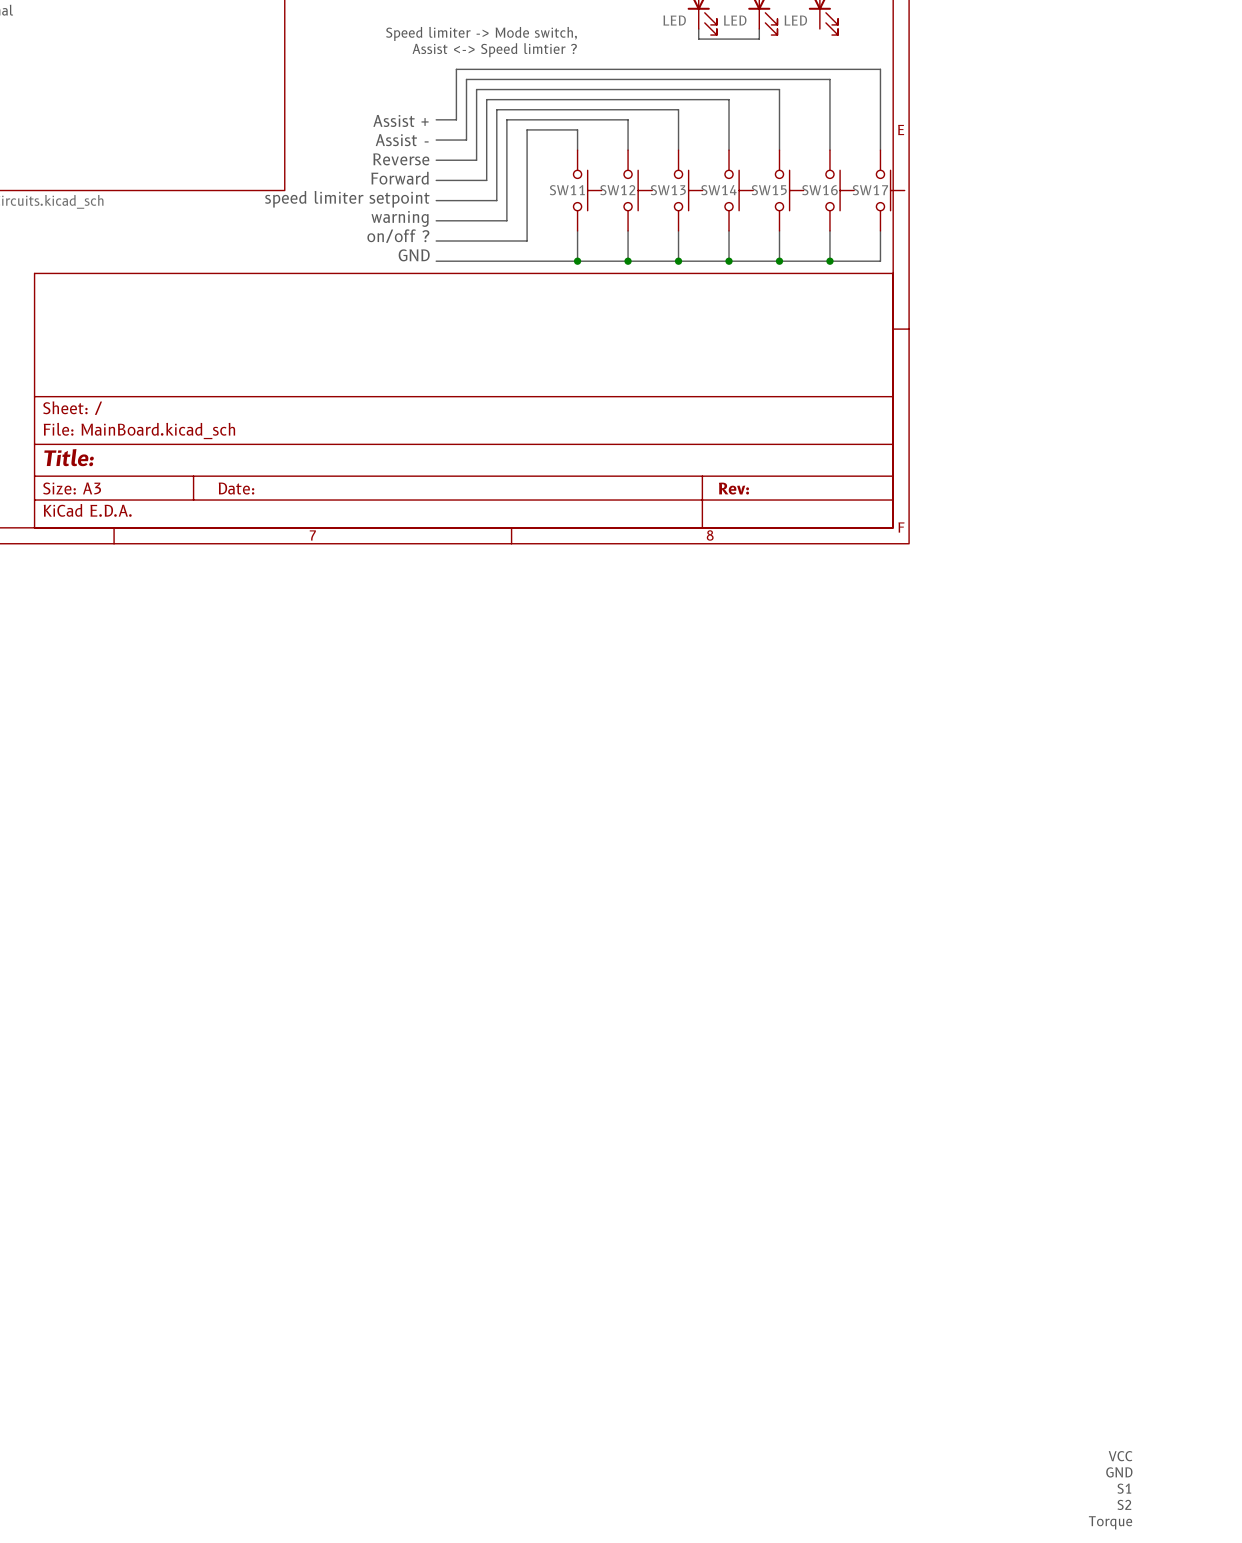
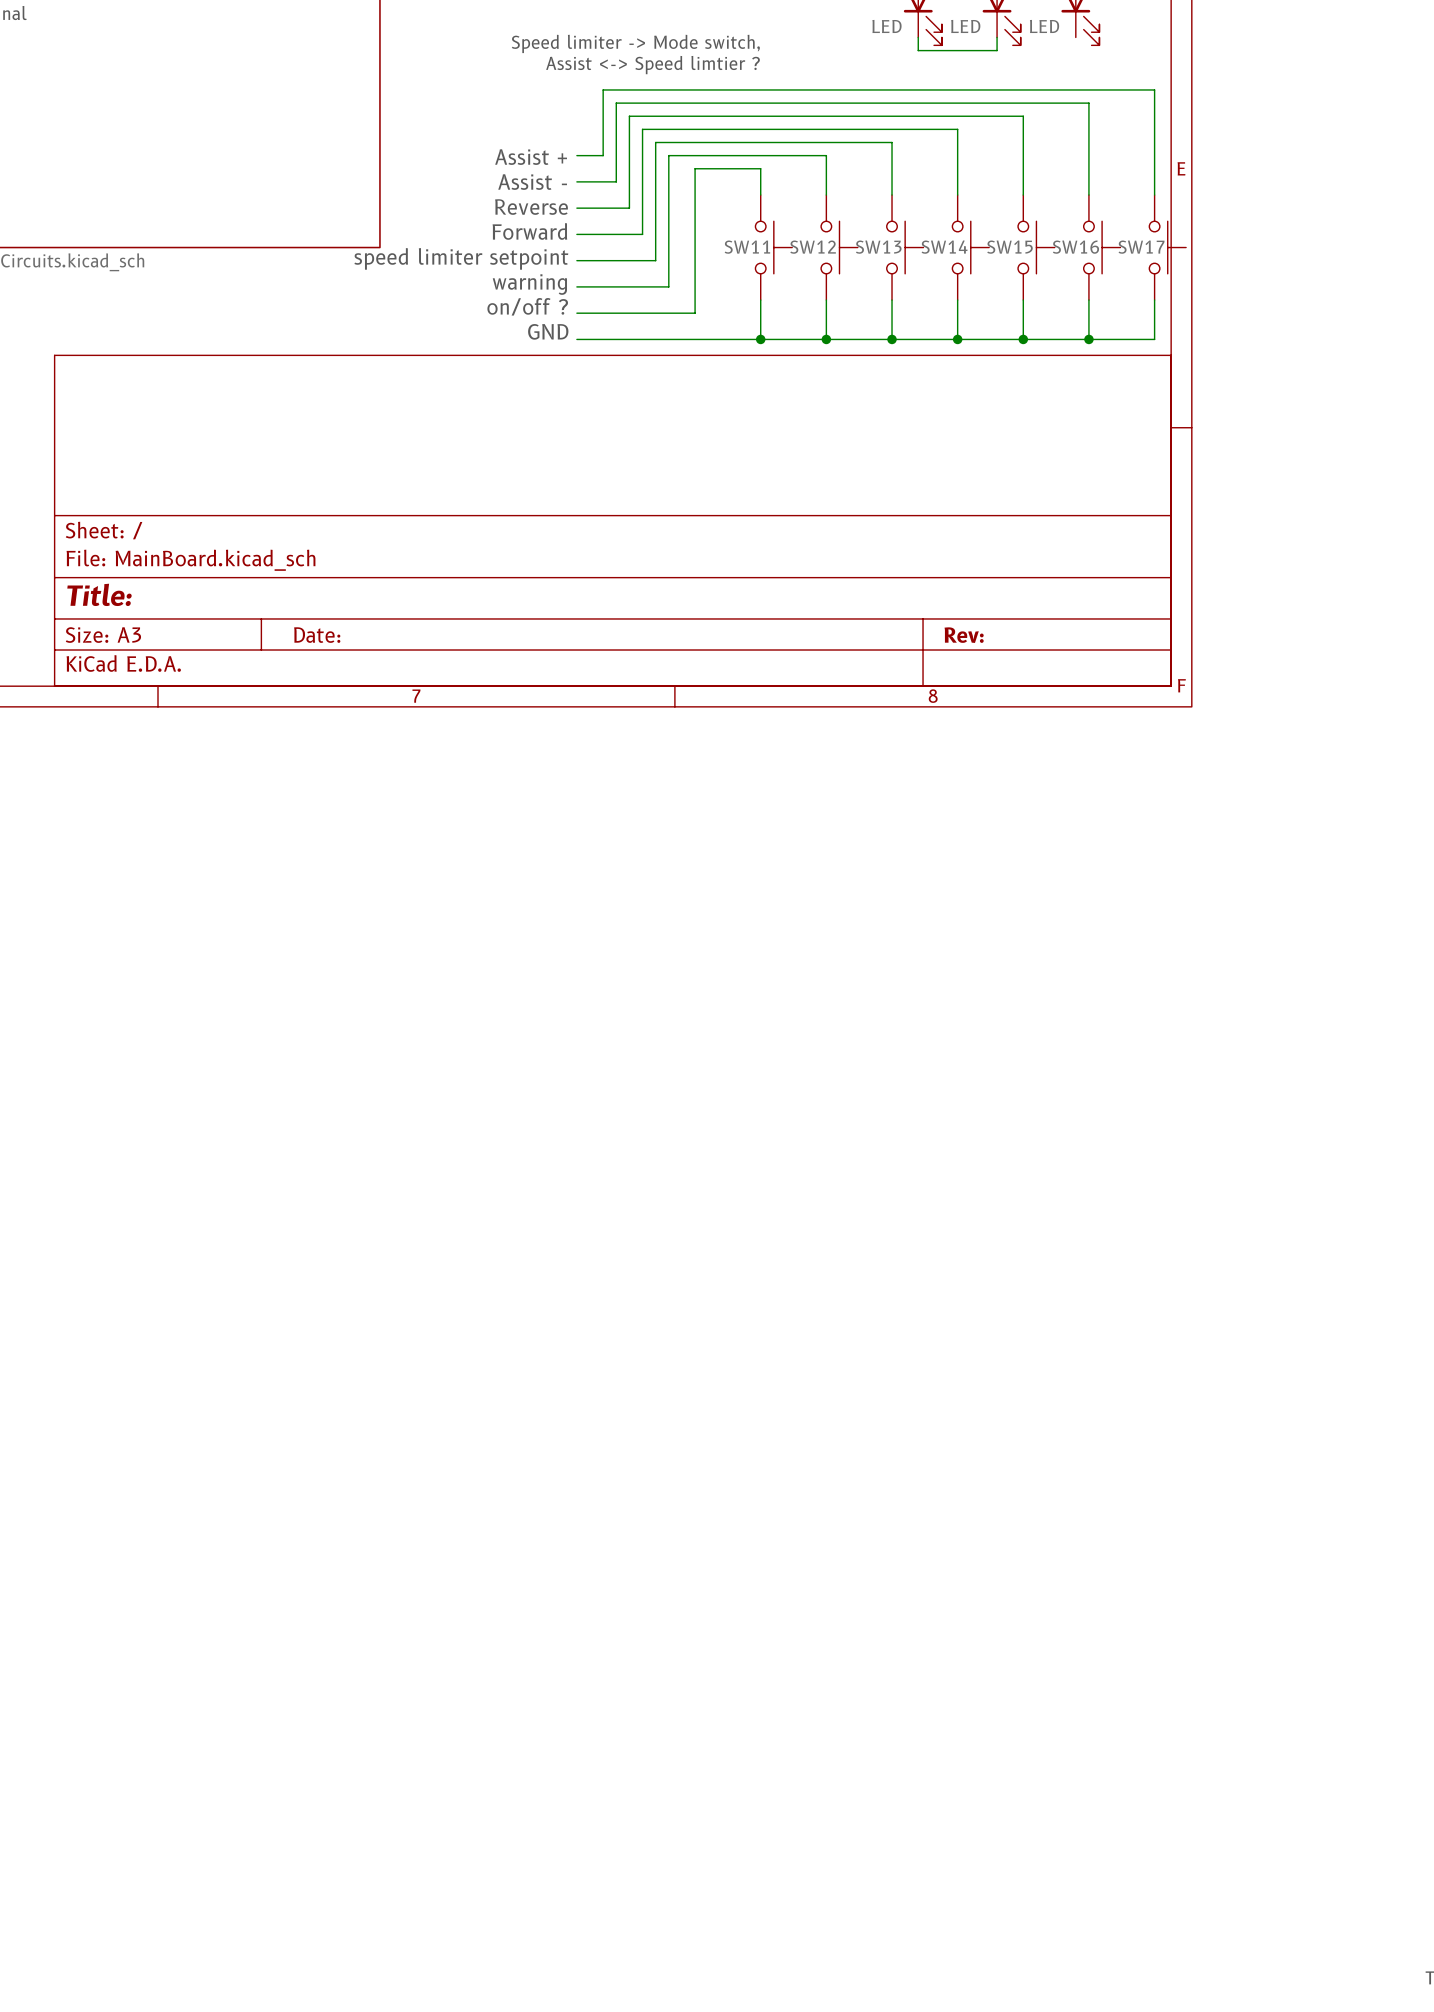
line: (698, 28) (698, 39) (759, 39) (759, 28) -> none
line: (436, 119) (456, 119) (456, 69) (880, 69) (880, 150) -> none
line: (436, 140) (466, 140) (466, 79) (829, 79) (829, 150) -> none
line: (577, 150) (577, 129) (527, 129) (527, 241) (436, 241) -> none
line: (628, 150) (628, 119) (506, 119) (506, 220) (436, 220) -> none
line: (678, 150) (678, 109) (496, 109) (496, 200) (436, 200) -> none
line: (729, 150) (729, 99) (486, 99) (486, 180) (436, 180) -> none
line: (779, 150) (779, 89) (476, 89) (476, 160) (436, 160) -> none
line: (577, 230) (577, 261) -> none
line: (628, 230) (628, 261) -> none
line: (678, 230) (678, 261) -> none
line: (729, 230) (729, 261) -> none
line: (779, 230) (779, 261) -> none
line: (829, 230) (829, 261) -> none
line: (880, 230) (880, 261) (436, 261) -> none

